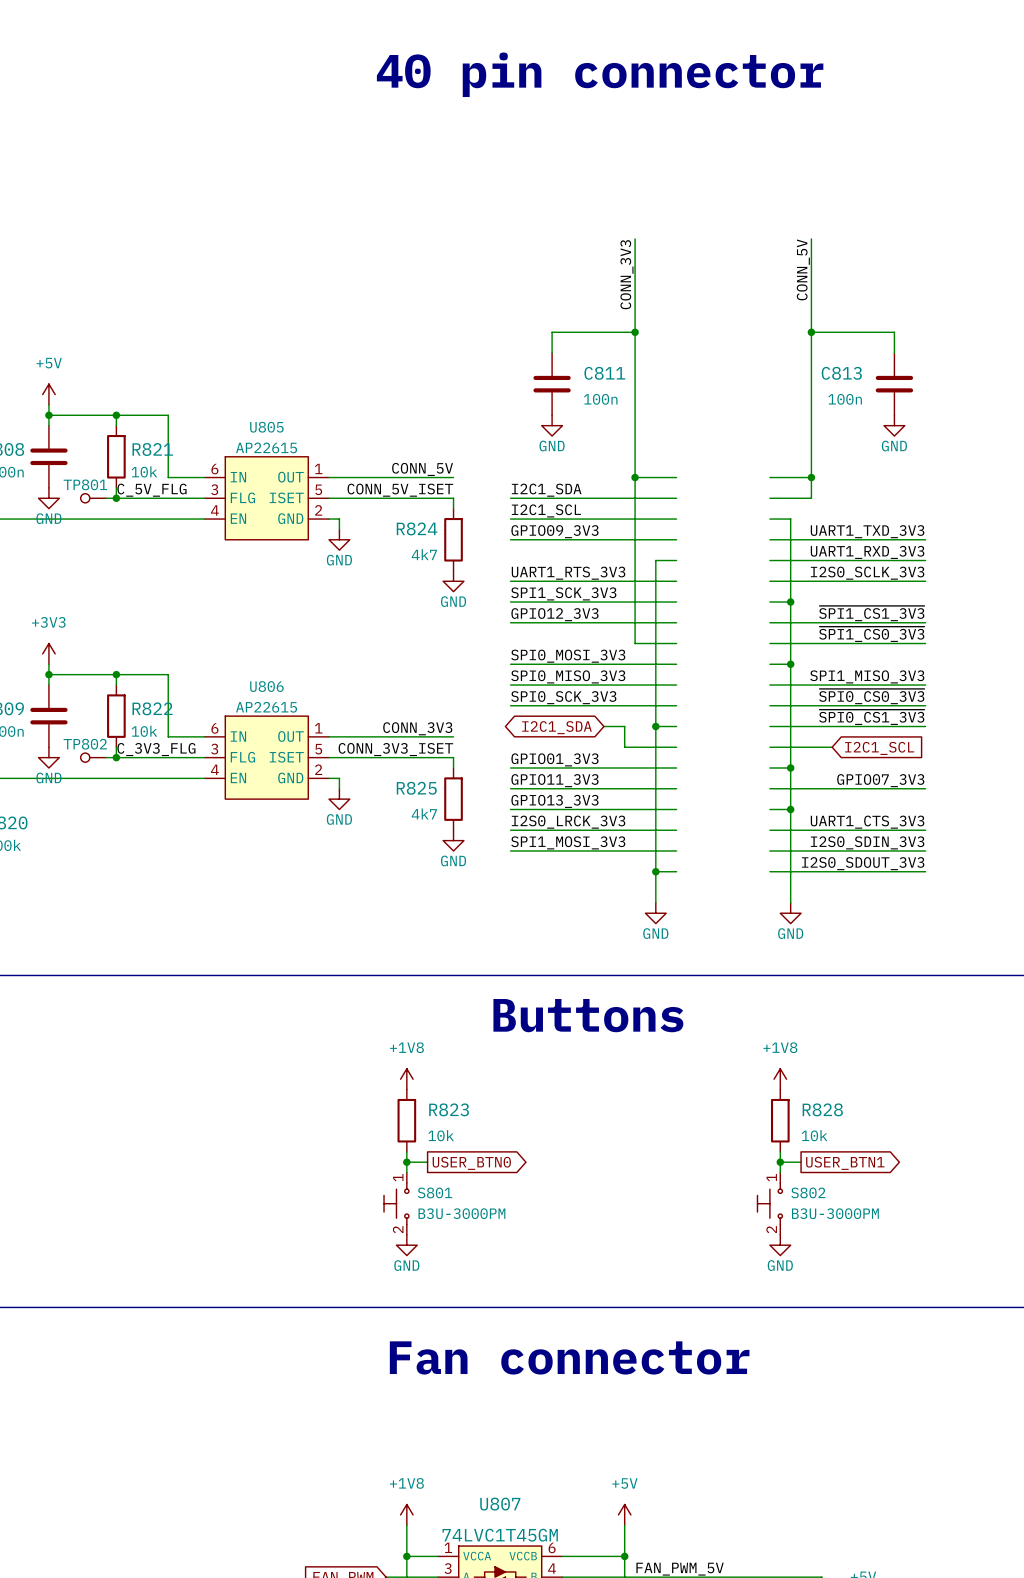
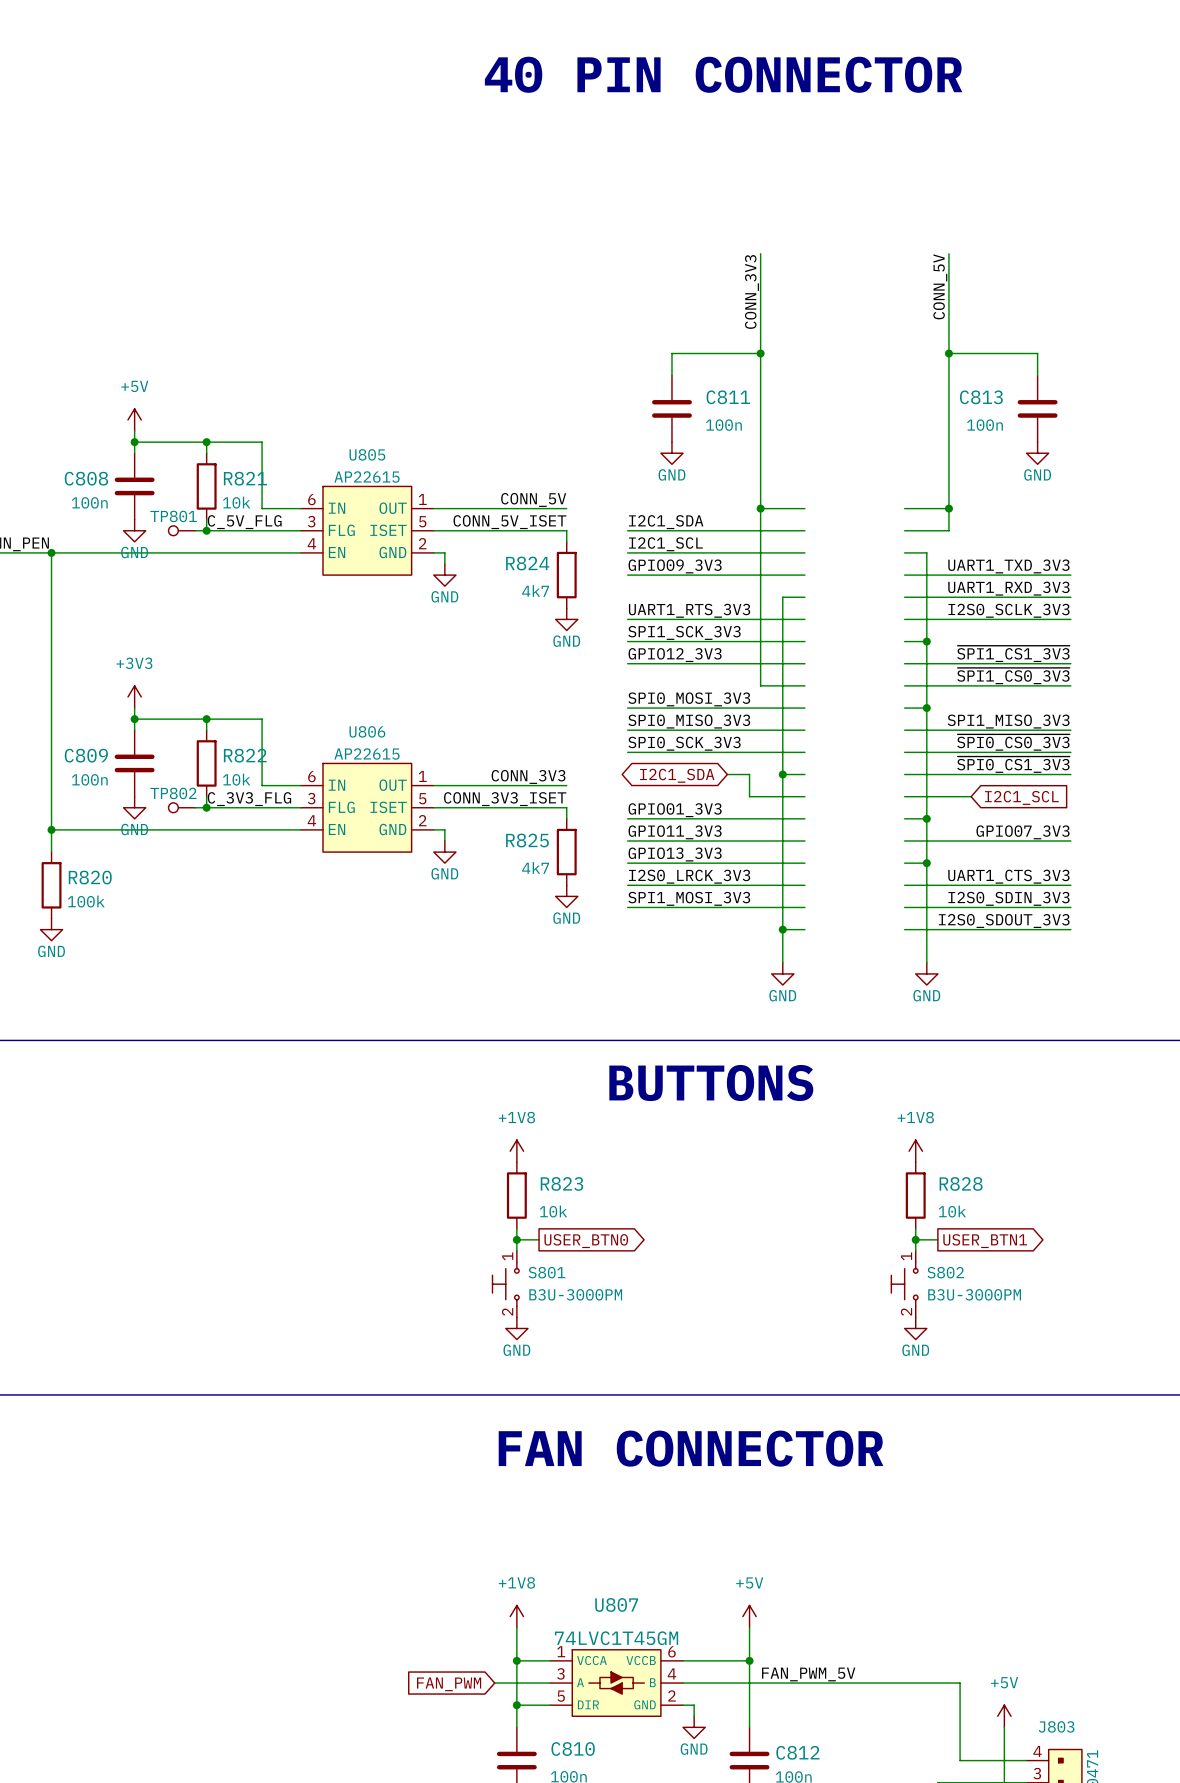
text: 40 pin connector (600, 74) -> 40 PIN CONNECTOR (723, 74)
text: Buttons (588, 1015) -> BUTTONS (711, 1083)
text: Fan connector (569, 1357) -> FAN CONNECTOR (691, 1448)

